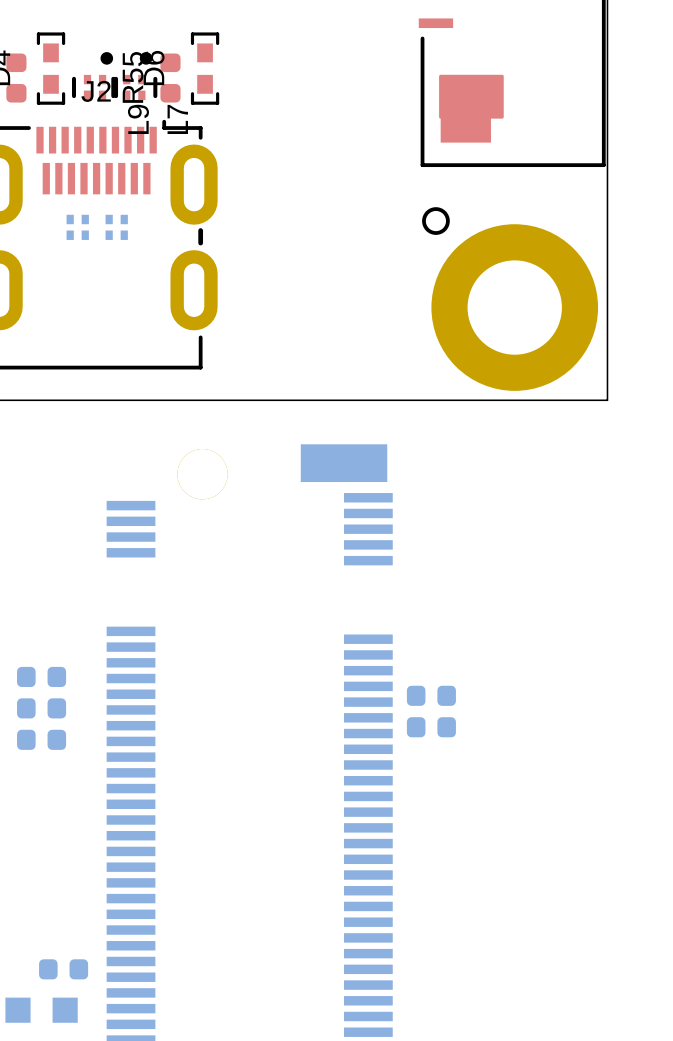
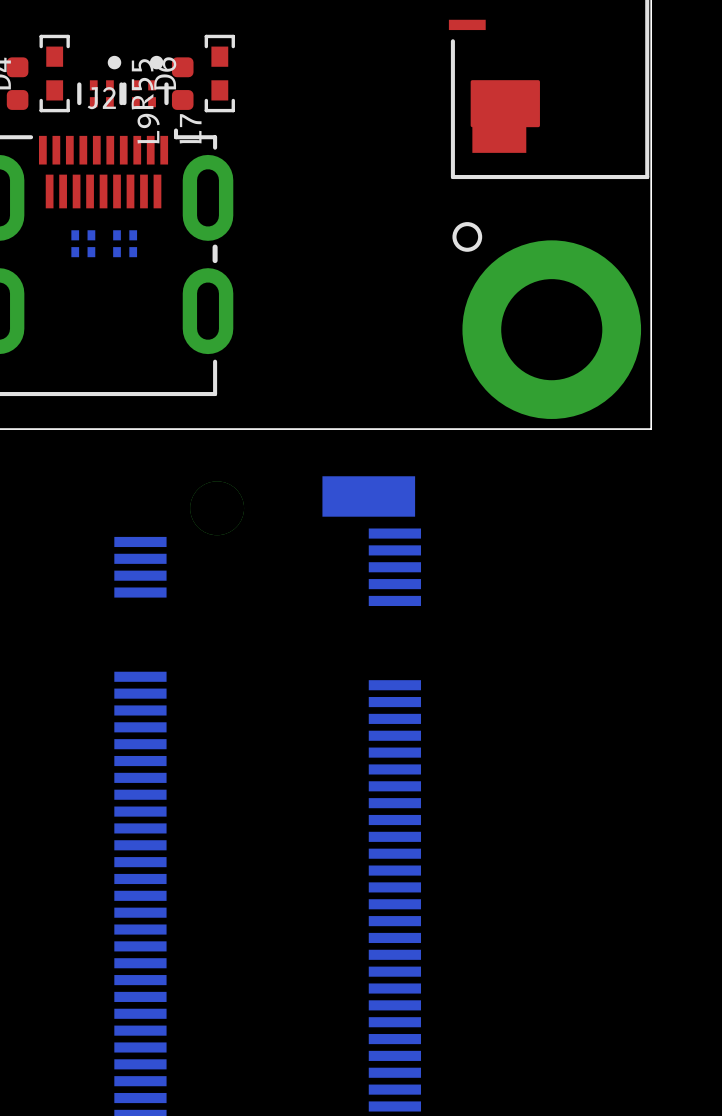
part: (41, 676) -> none
part: (431, 695) -> none
part: (41, 708) -> none
part: (431, 727) -> none
part: (41, 739) -> none
part: (63, 969) -> none
part: (41, 1010) -> none

